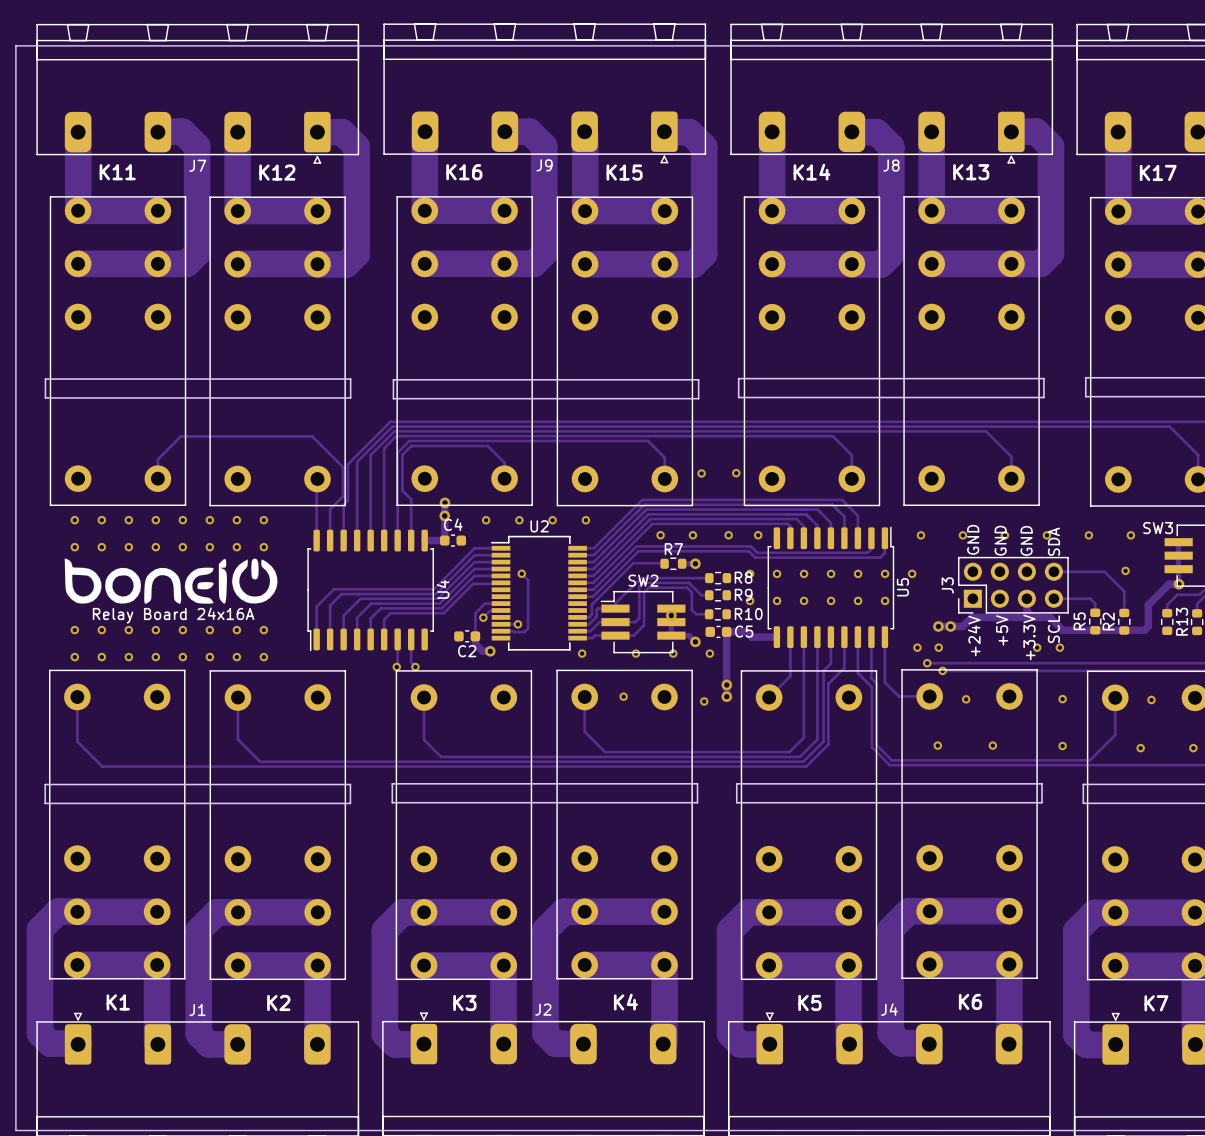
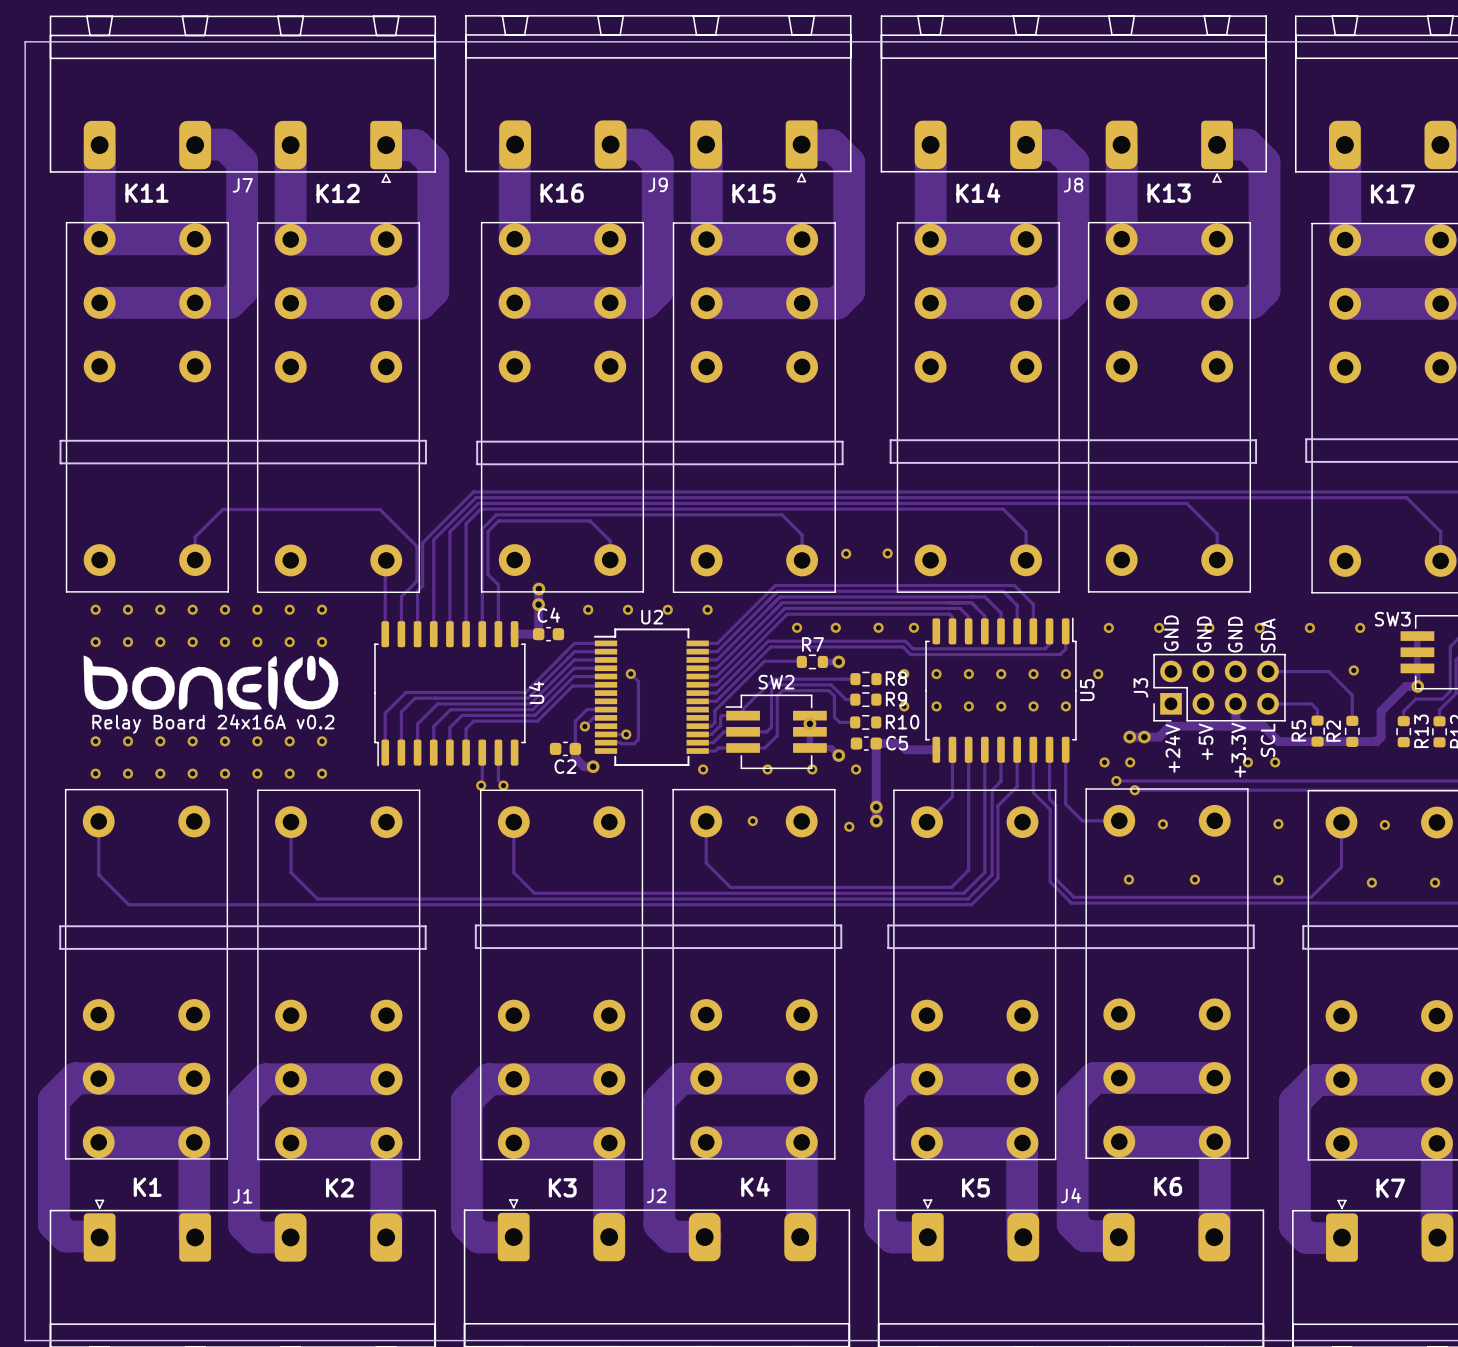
text: Relay Board 24x16A (173, 615) -> Relay Board 24x16A v0.2 (213, 723)

